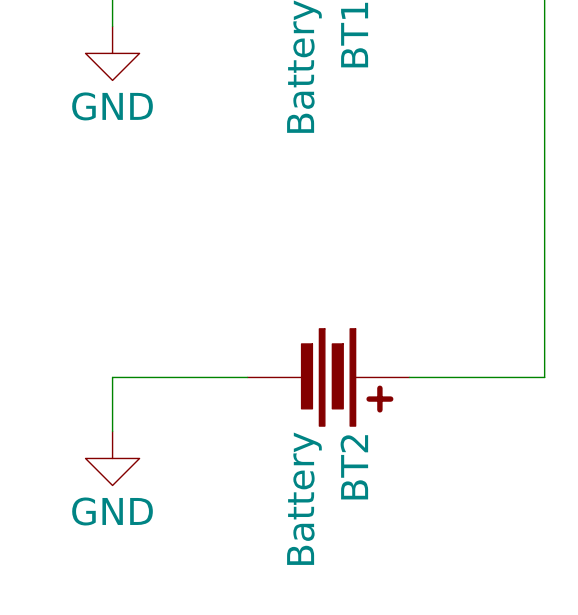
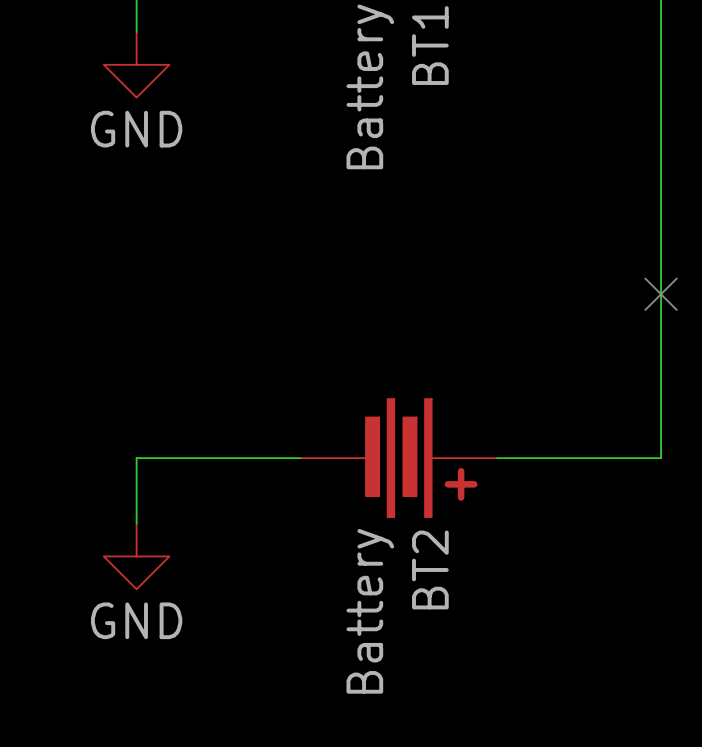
no-connect mark: none -> (661, 294)

